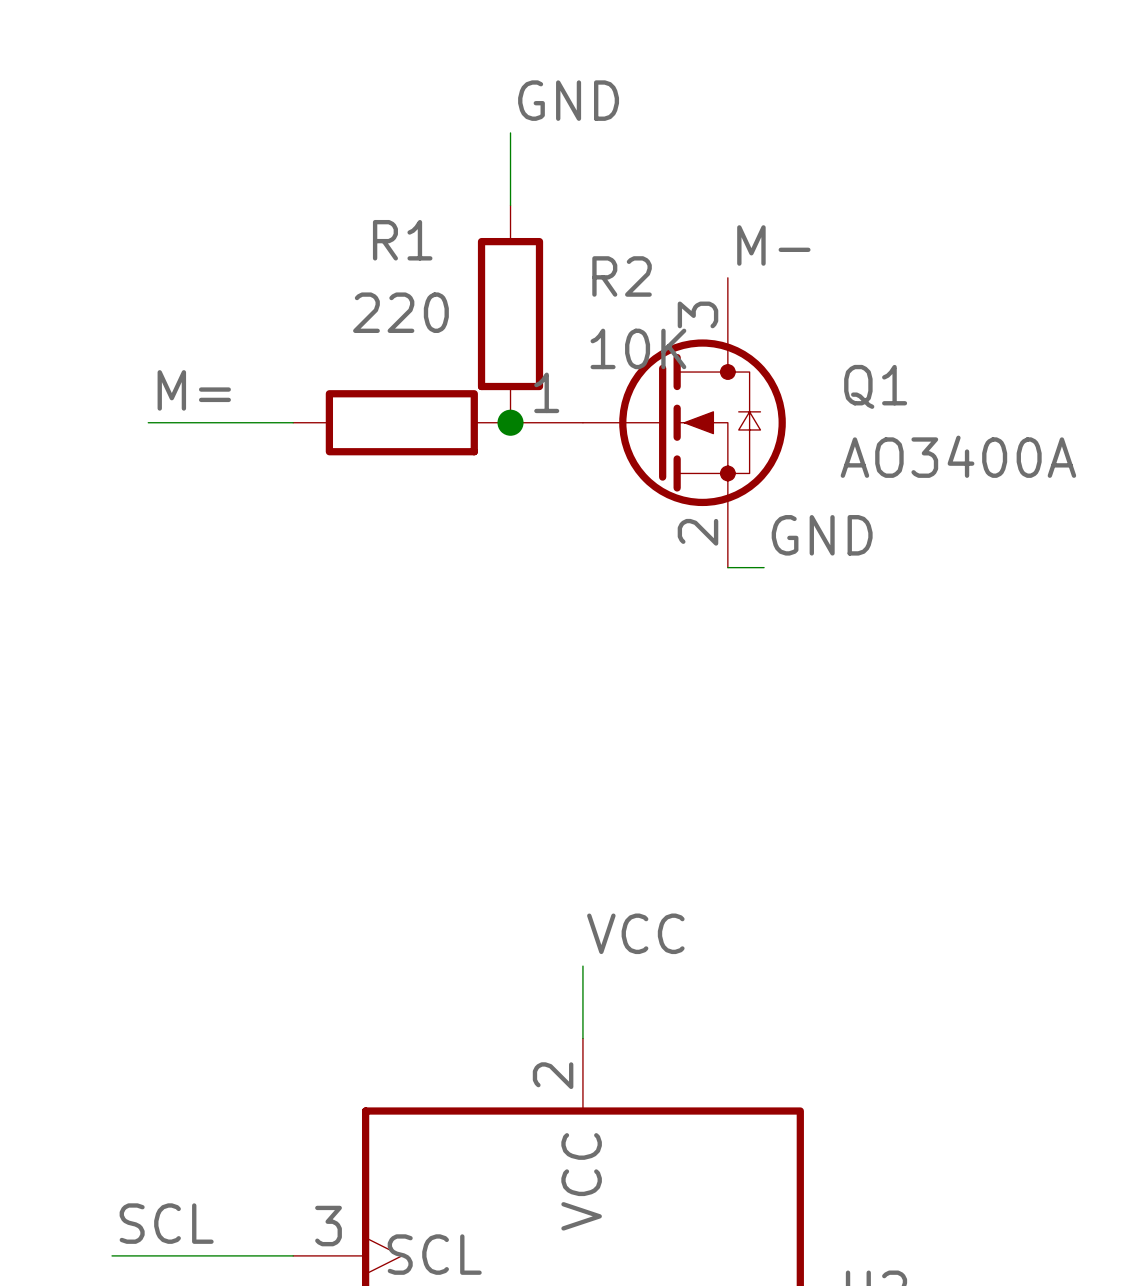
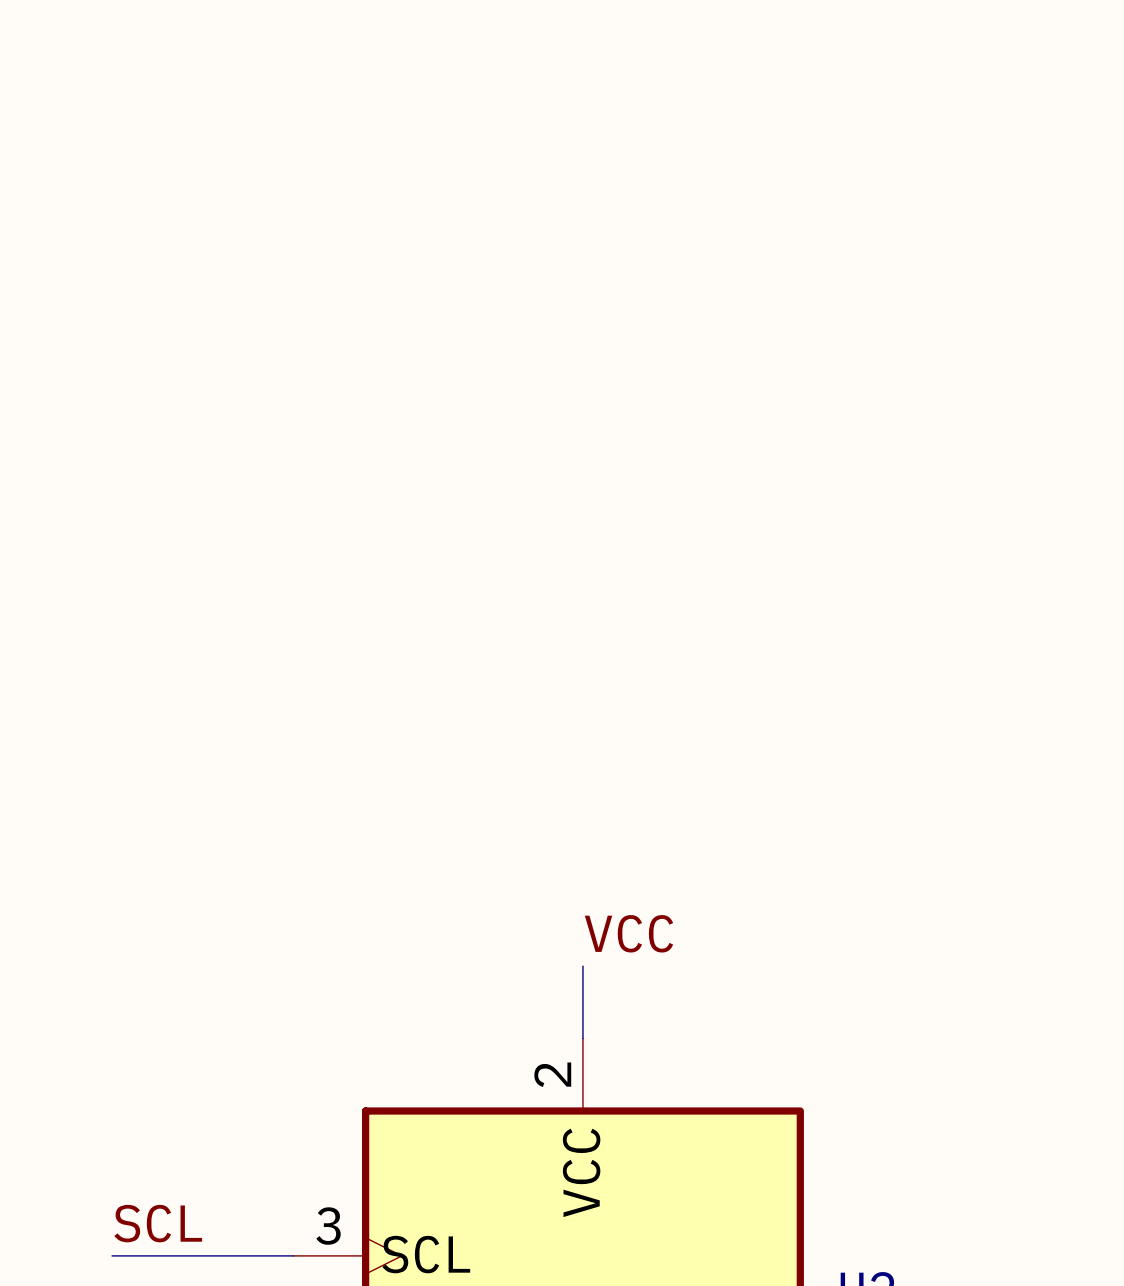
label: GND (568, 100) -> none
wire: (510, 132) (510, 205) -> none
label: M- (773, 245) -> none
R2: 10K (510, 314) -> none
label: M= (194, 390) -> none
wire: (148, 422) (293, 422) -> none
R1: 220 (401, 422) -> none
junction: (510, 422) -> none
Q1: AO3400A (648, 422) -> none
label: GND (822, 535) -> none
wire: (727, 567) (764, 567) -> none

